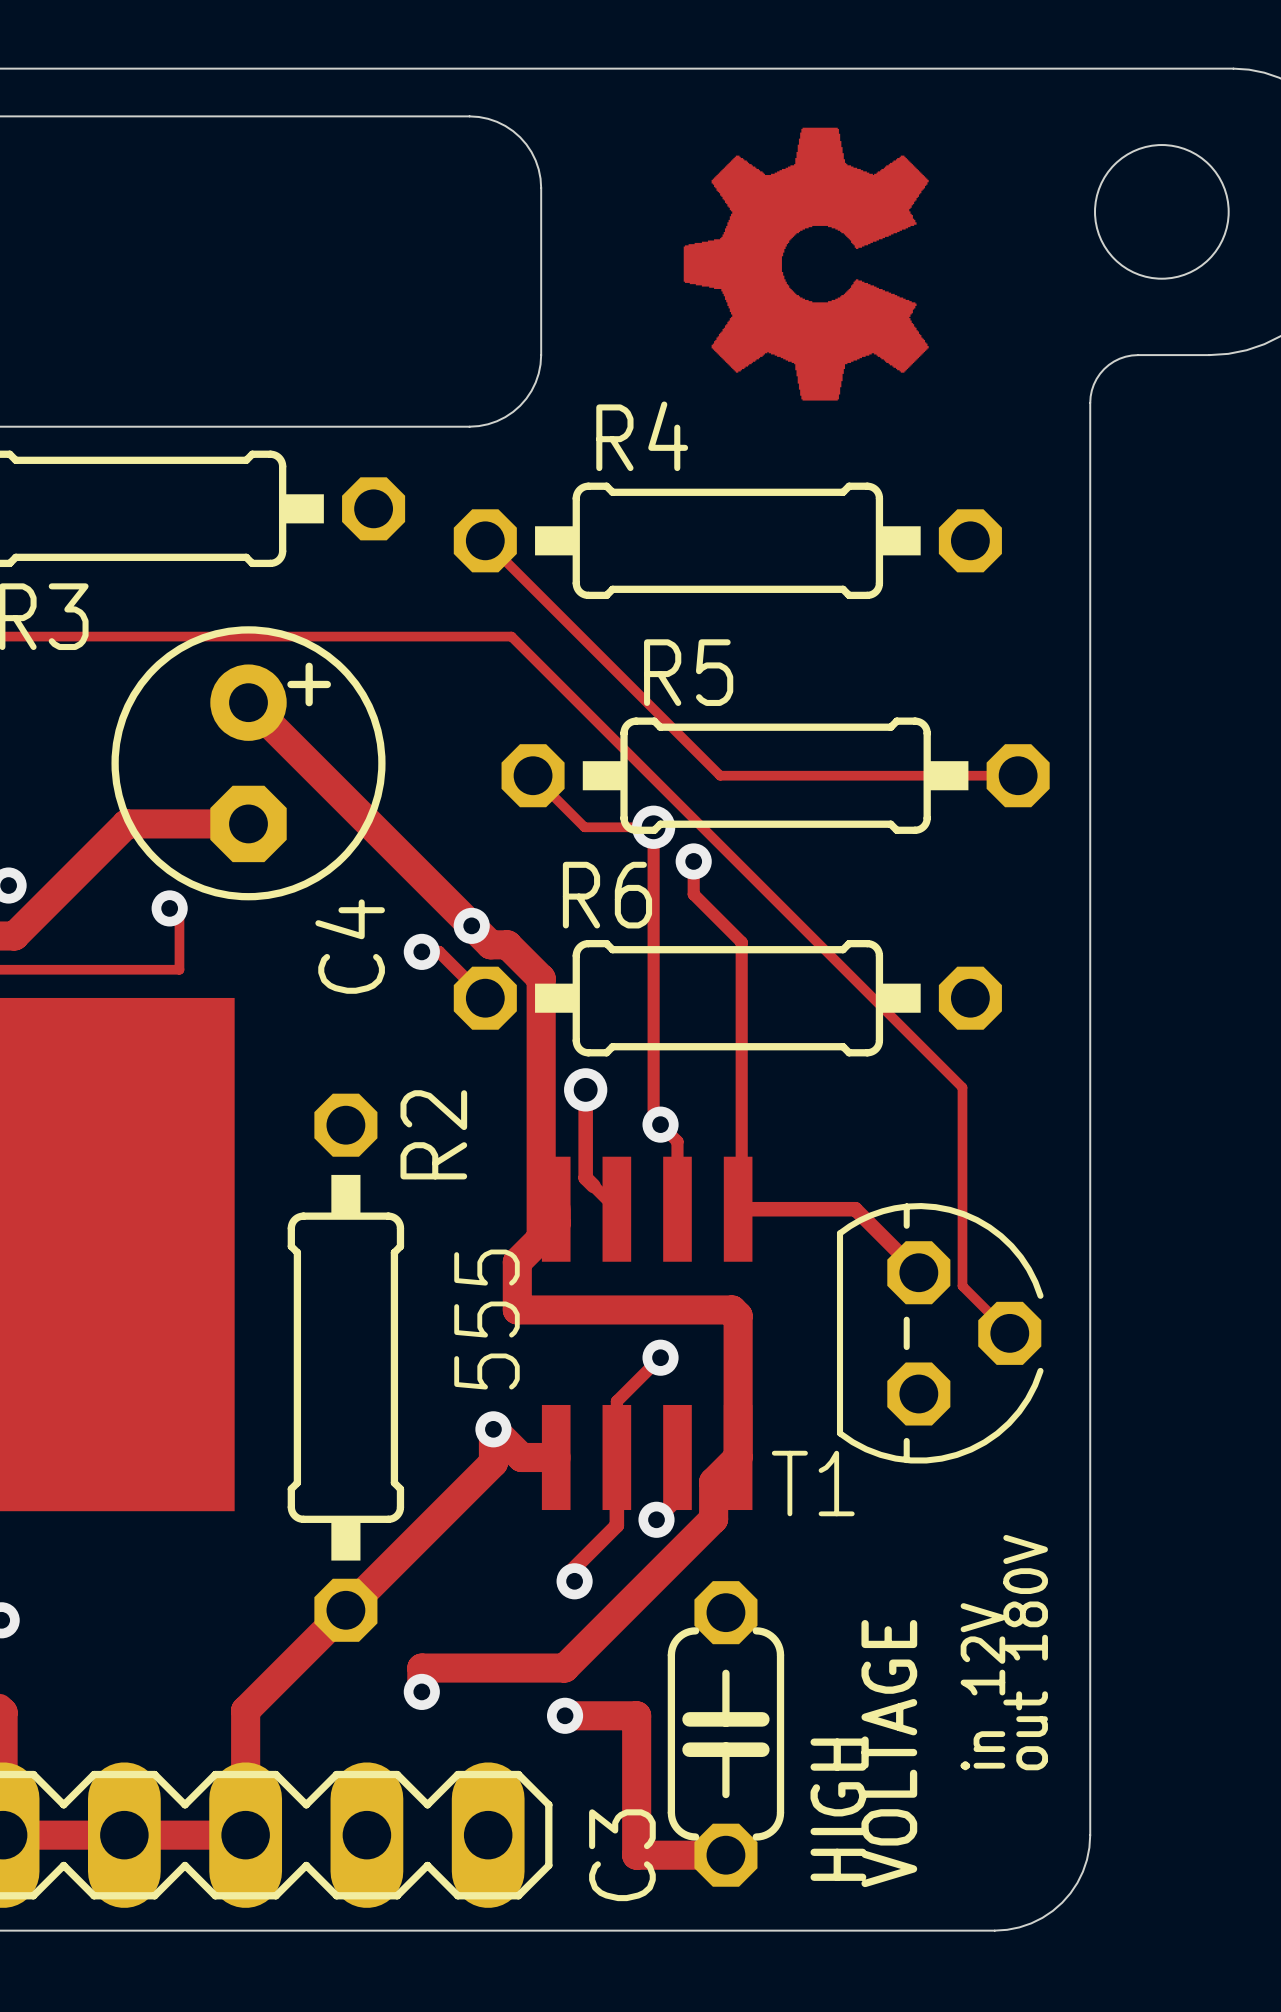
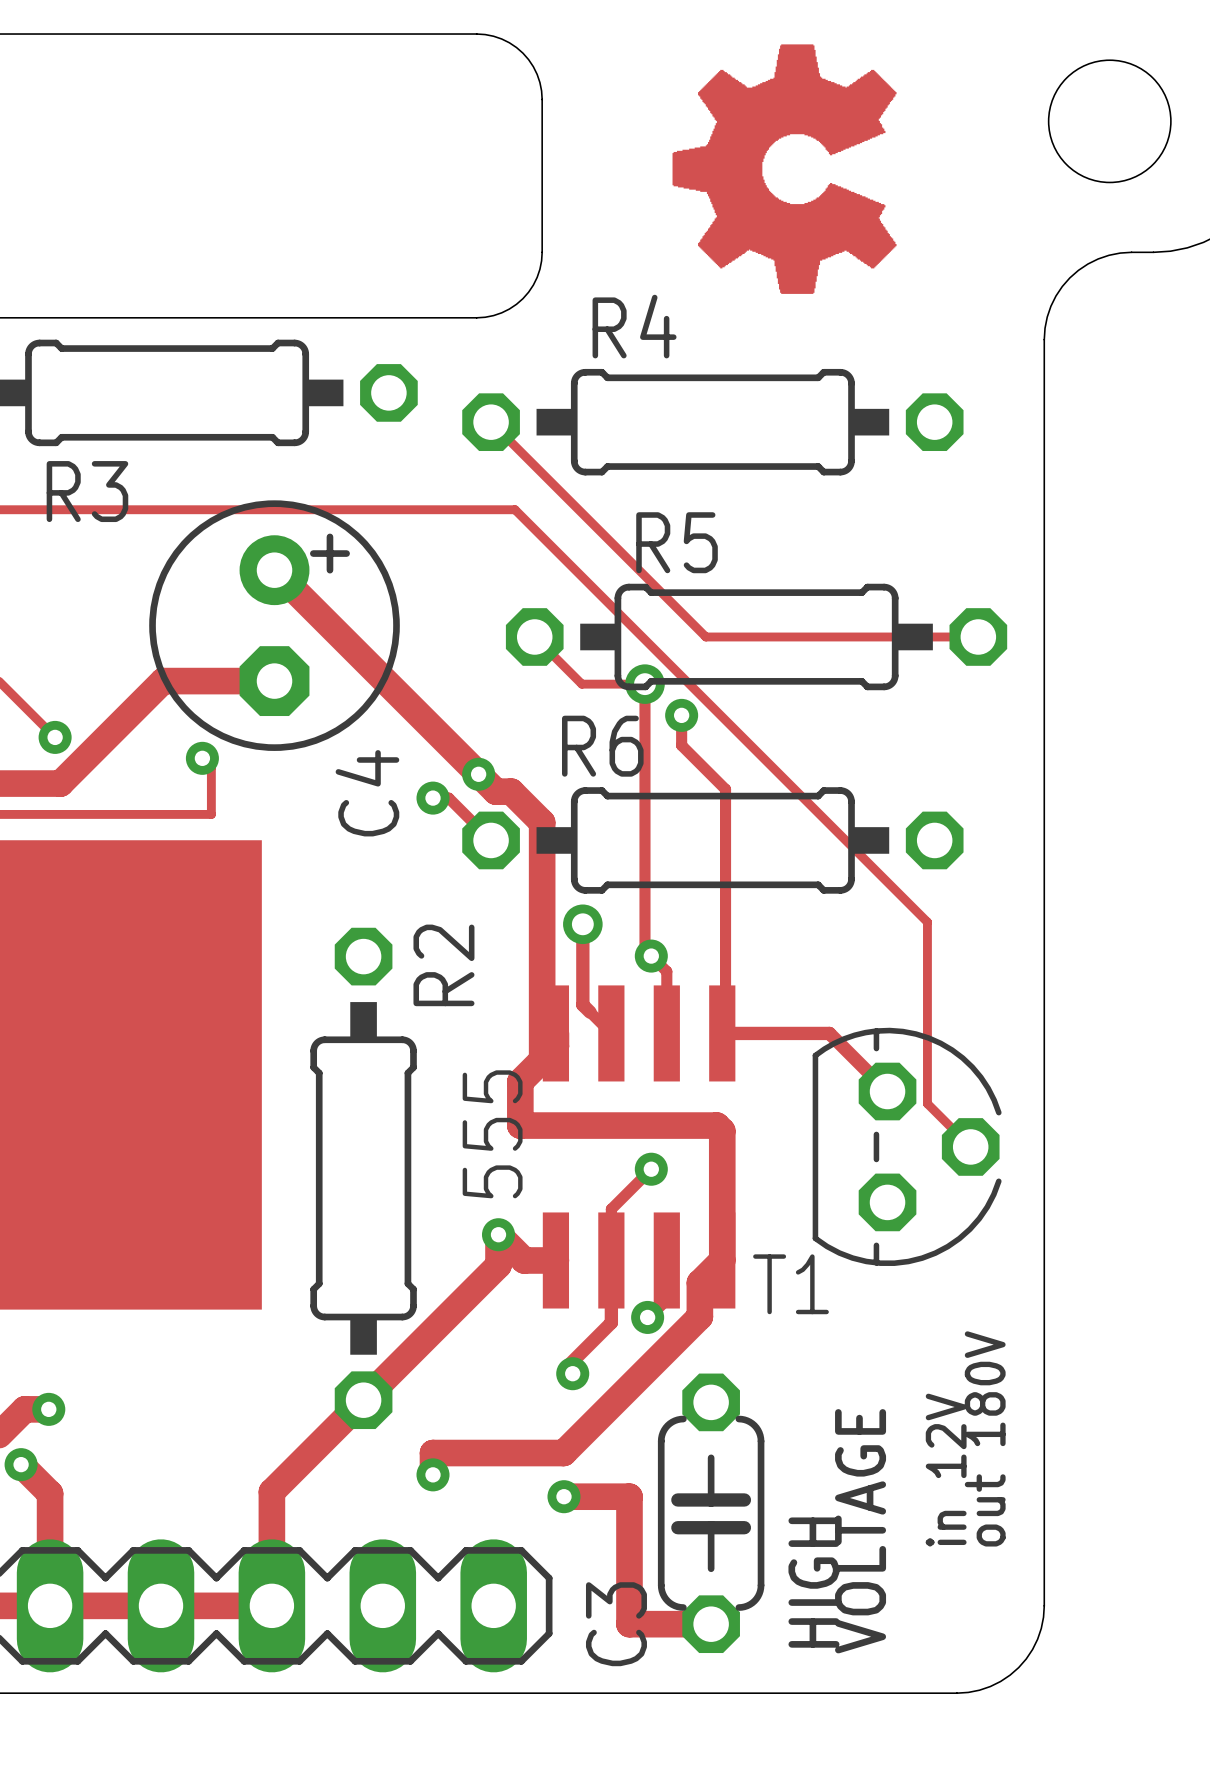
board edge: (1185, 355) (1131, 355) (1119, 358) (1104, 369) (1093, 384) (1090, 396) (1090, 450) -> (1131, 252) (1098, 258) (1069, 277) (1050, 306) (1044, 339)

